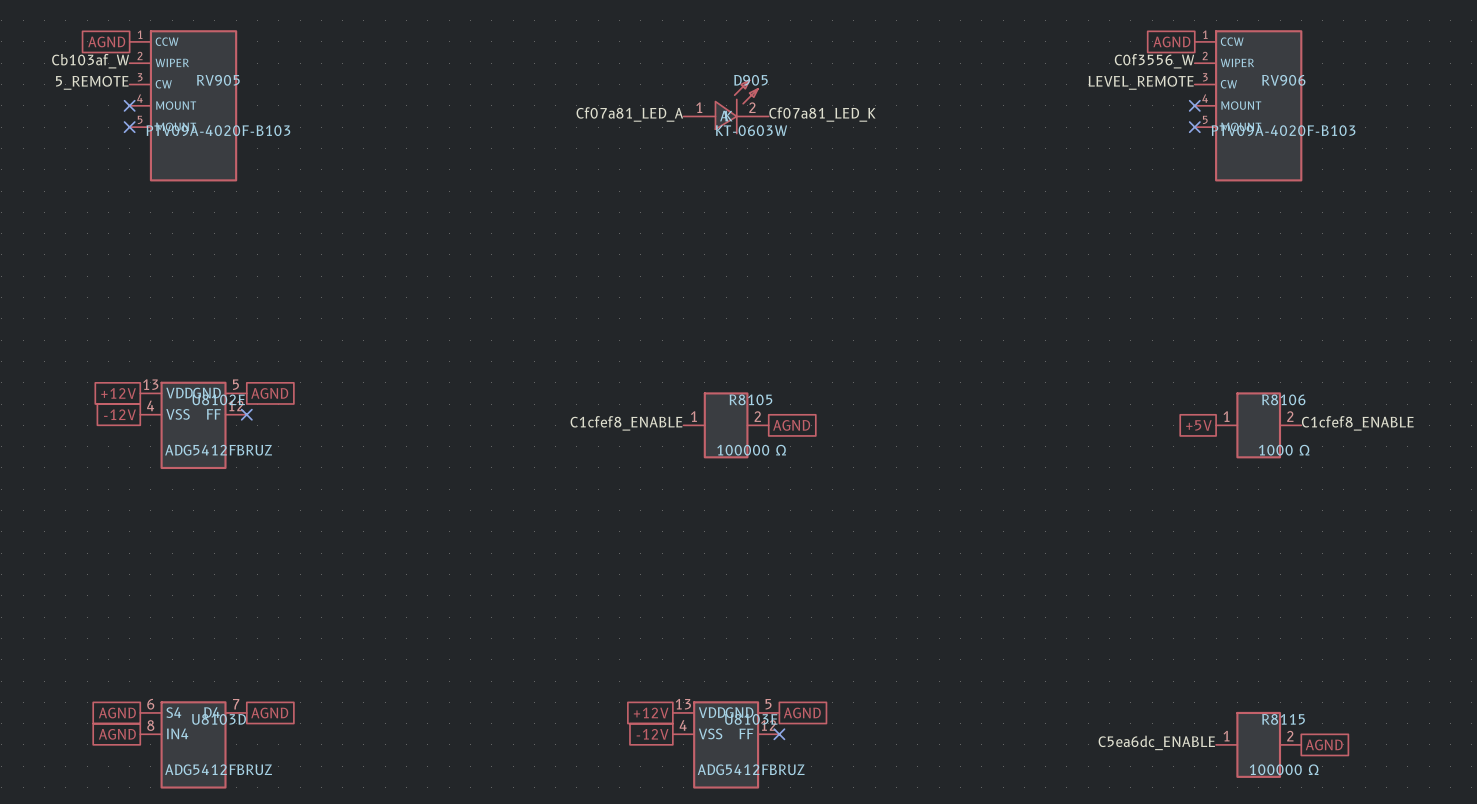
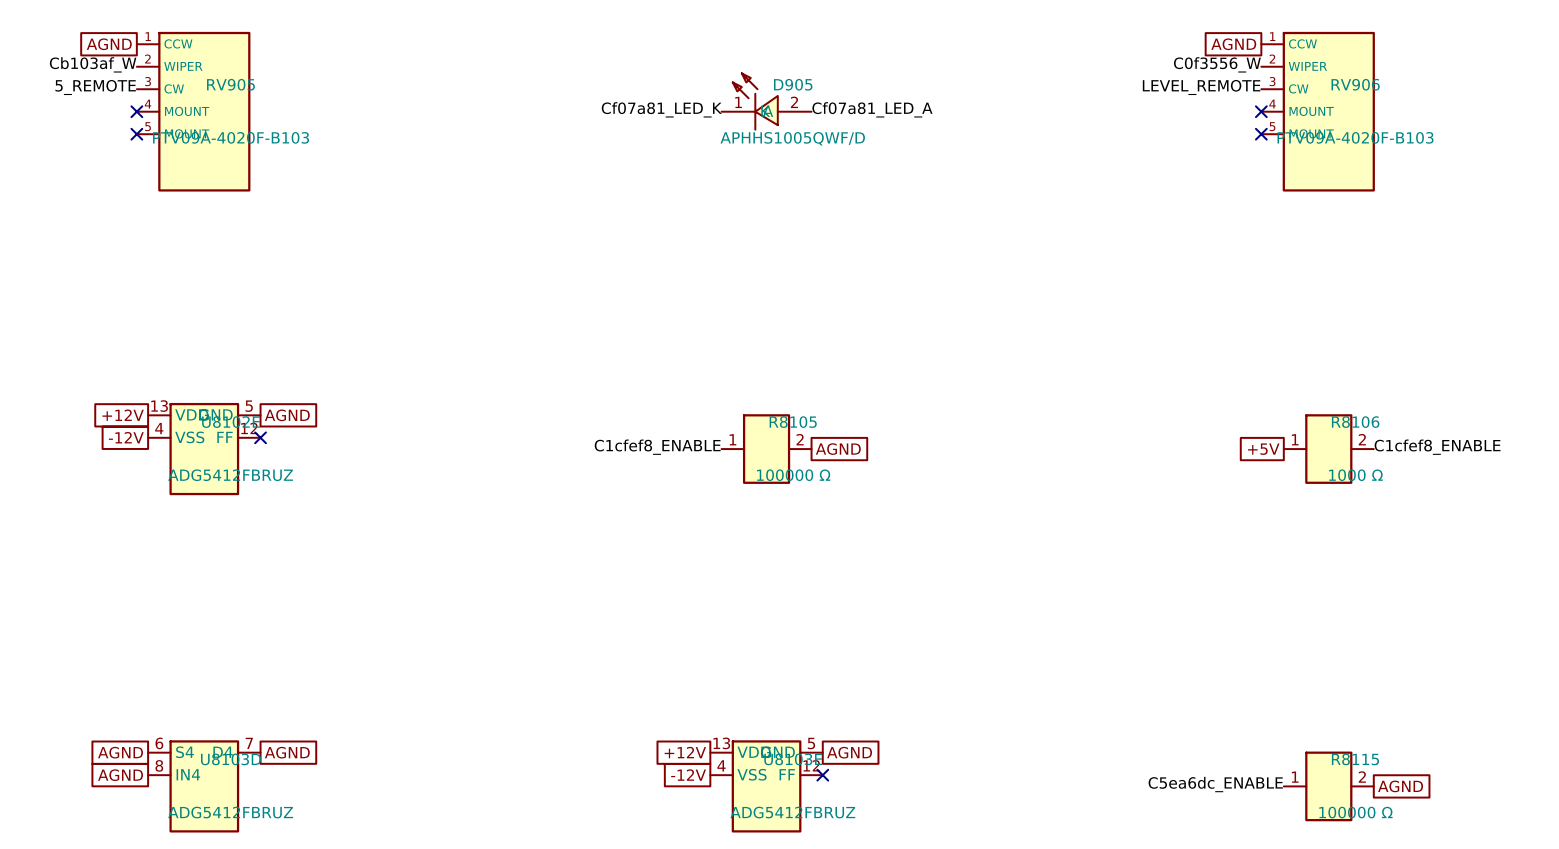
D905 symbol: [683, 80, 769, 134] -> [721, 73, 812, 130]
label position: Cf07a81_LED_A (629, 114) -> Cf07a81_LED_A (872, 109)
label position: Cf07a81_LED_K (822, 114) -> Cf07a81_LED_K (661, 109)
D905 value: KT-0603W (751, 130) -> APHHS1005QWF/D (792, 138)

